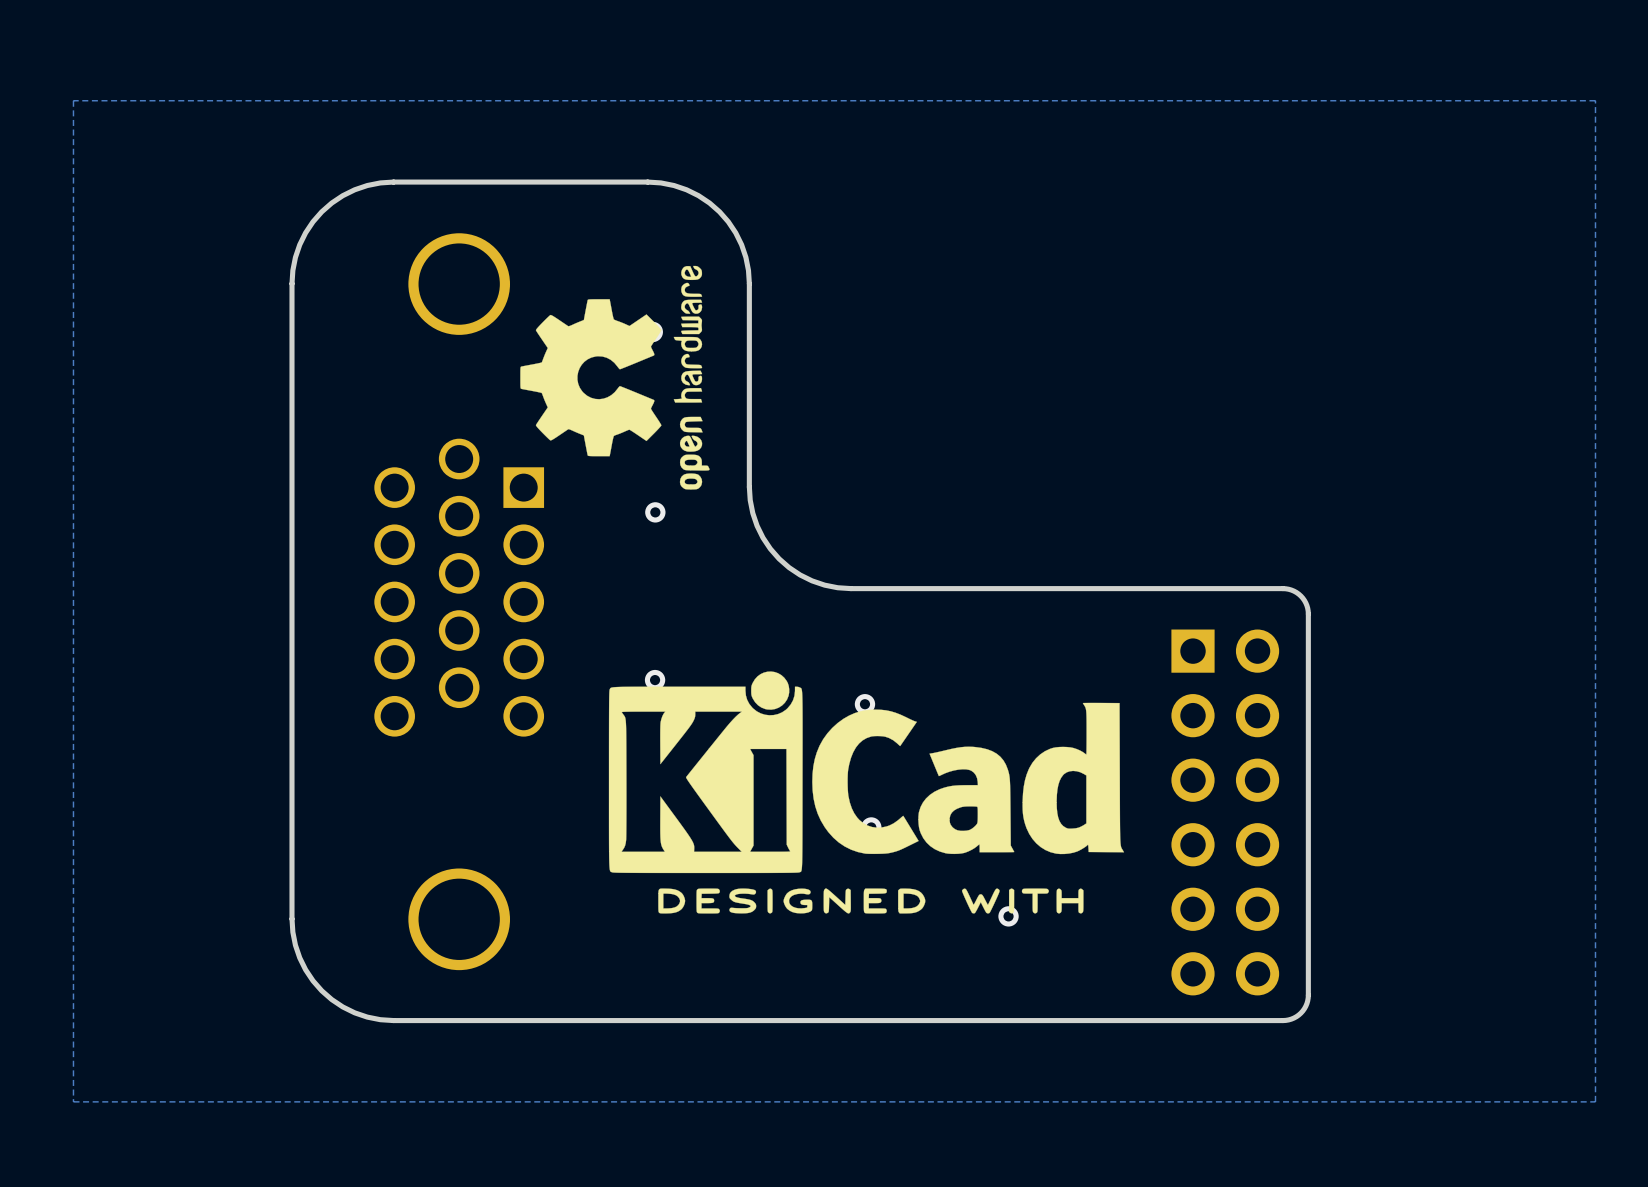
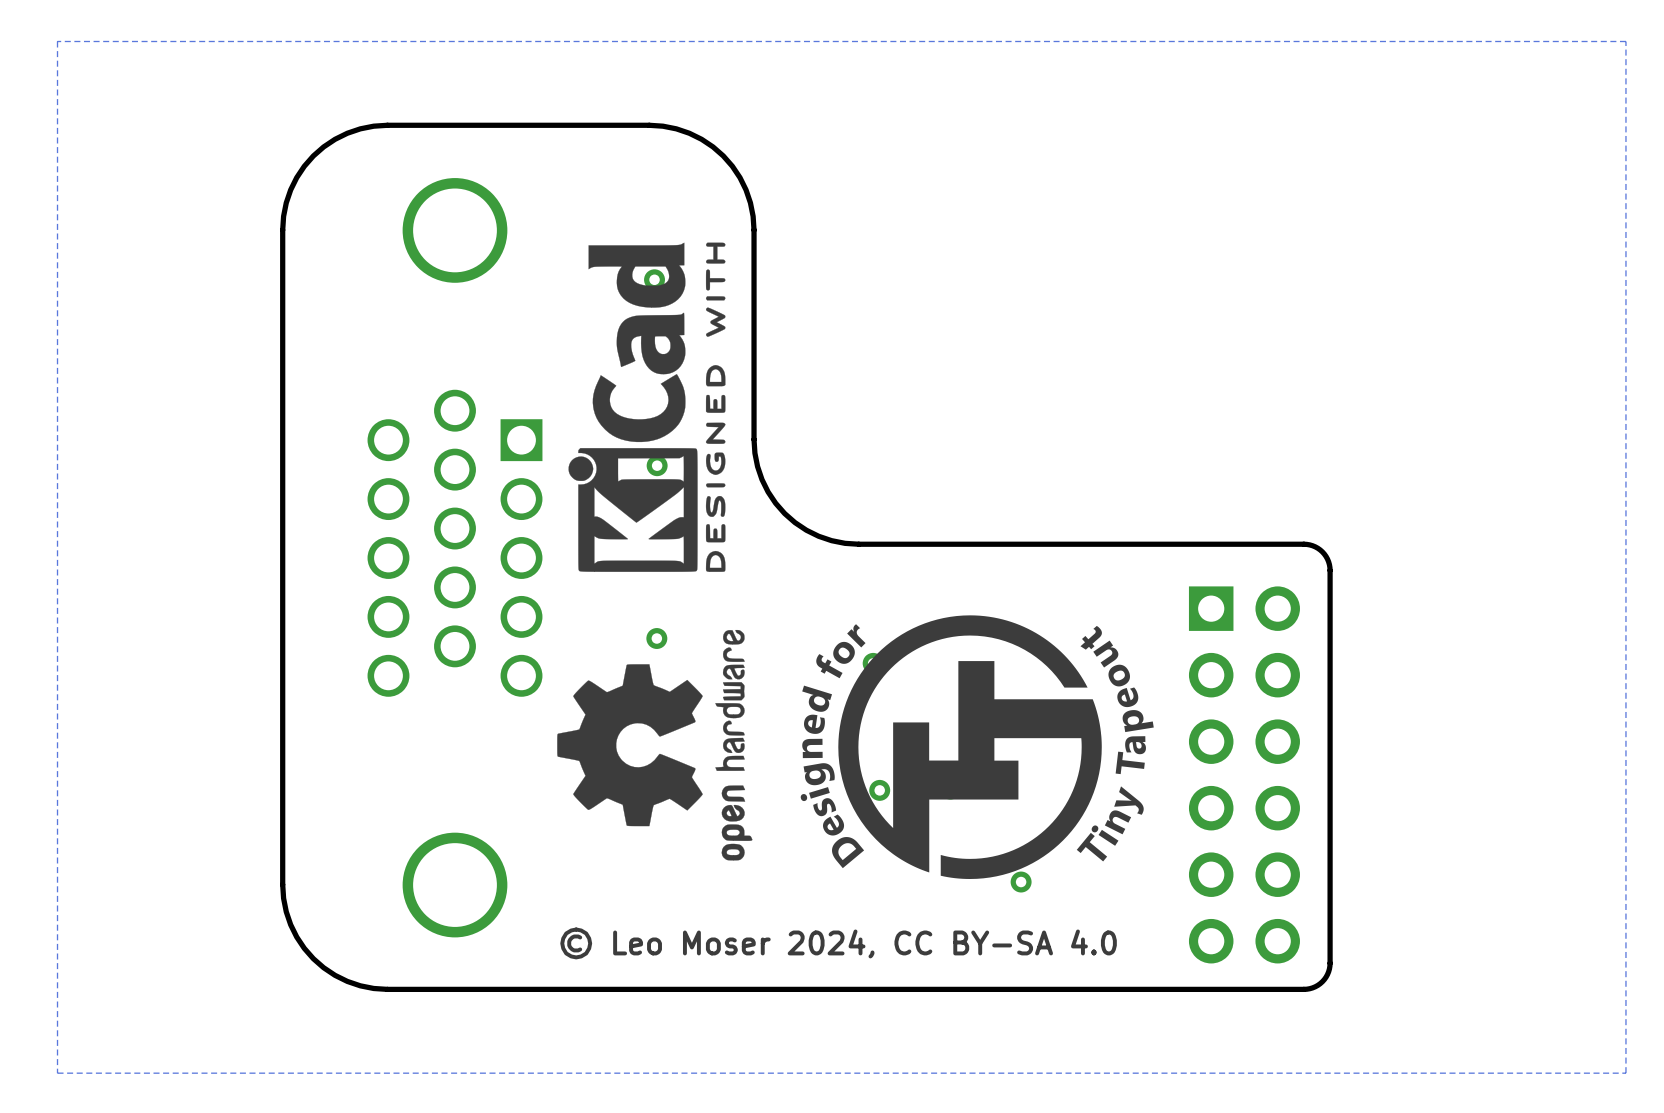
drawing: none -> [568, 242, 726, 572]
drawing position: (614, 377) -> (654, 745)
drawing: none -> [800, 615, 1154, 880]
drawing: [608, 671, 1125, 914] -> none
text: none -> © Leo Moser 2024, CC BY-SA 4.0 (838, 943)

